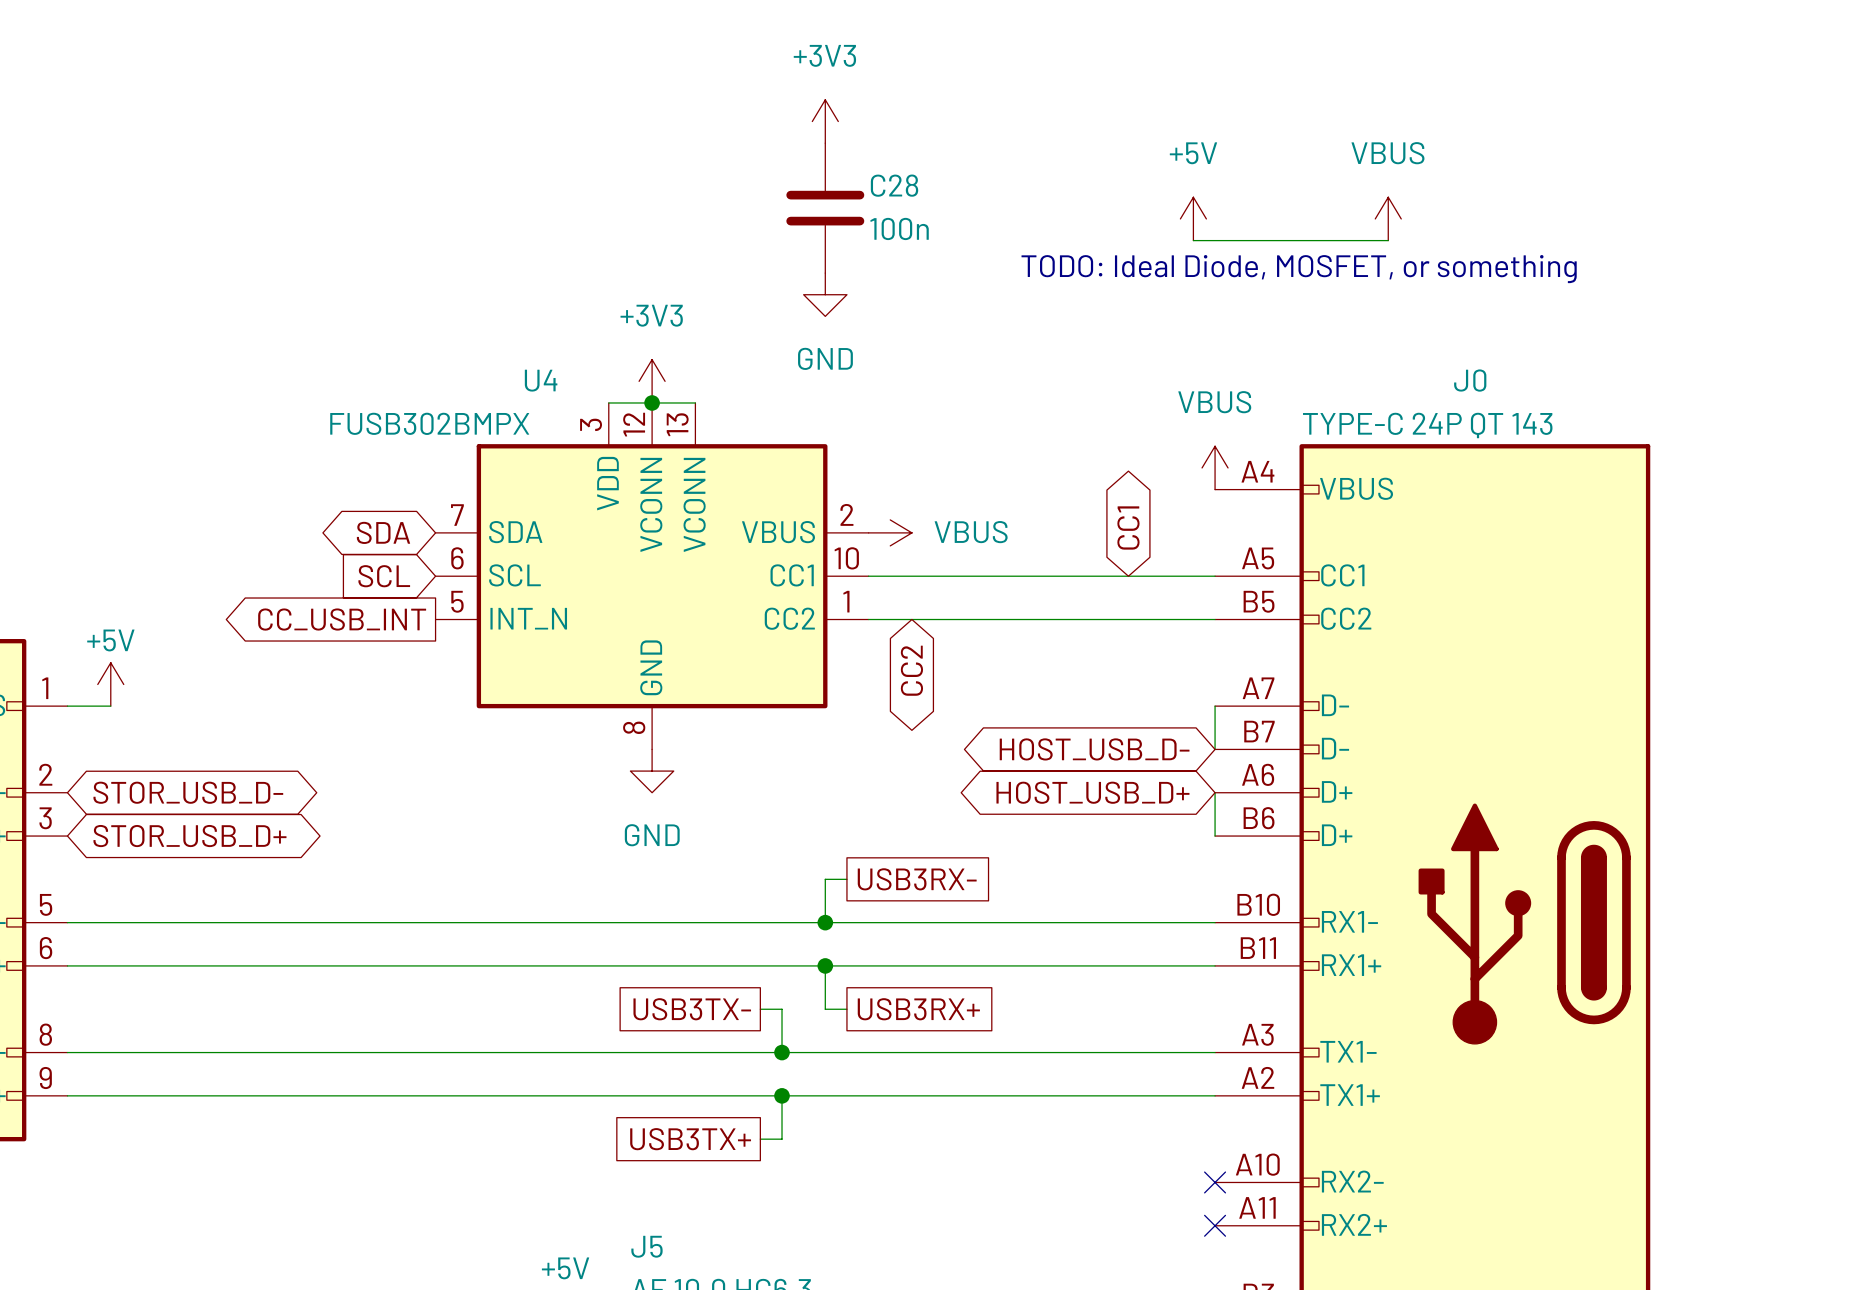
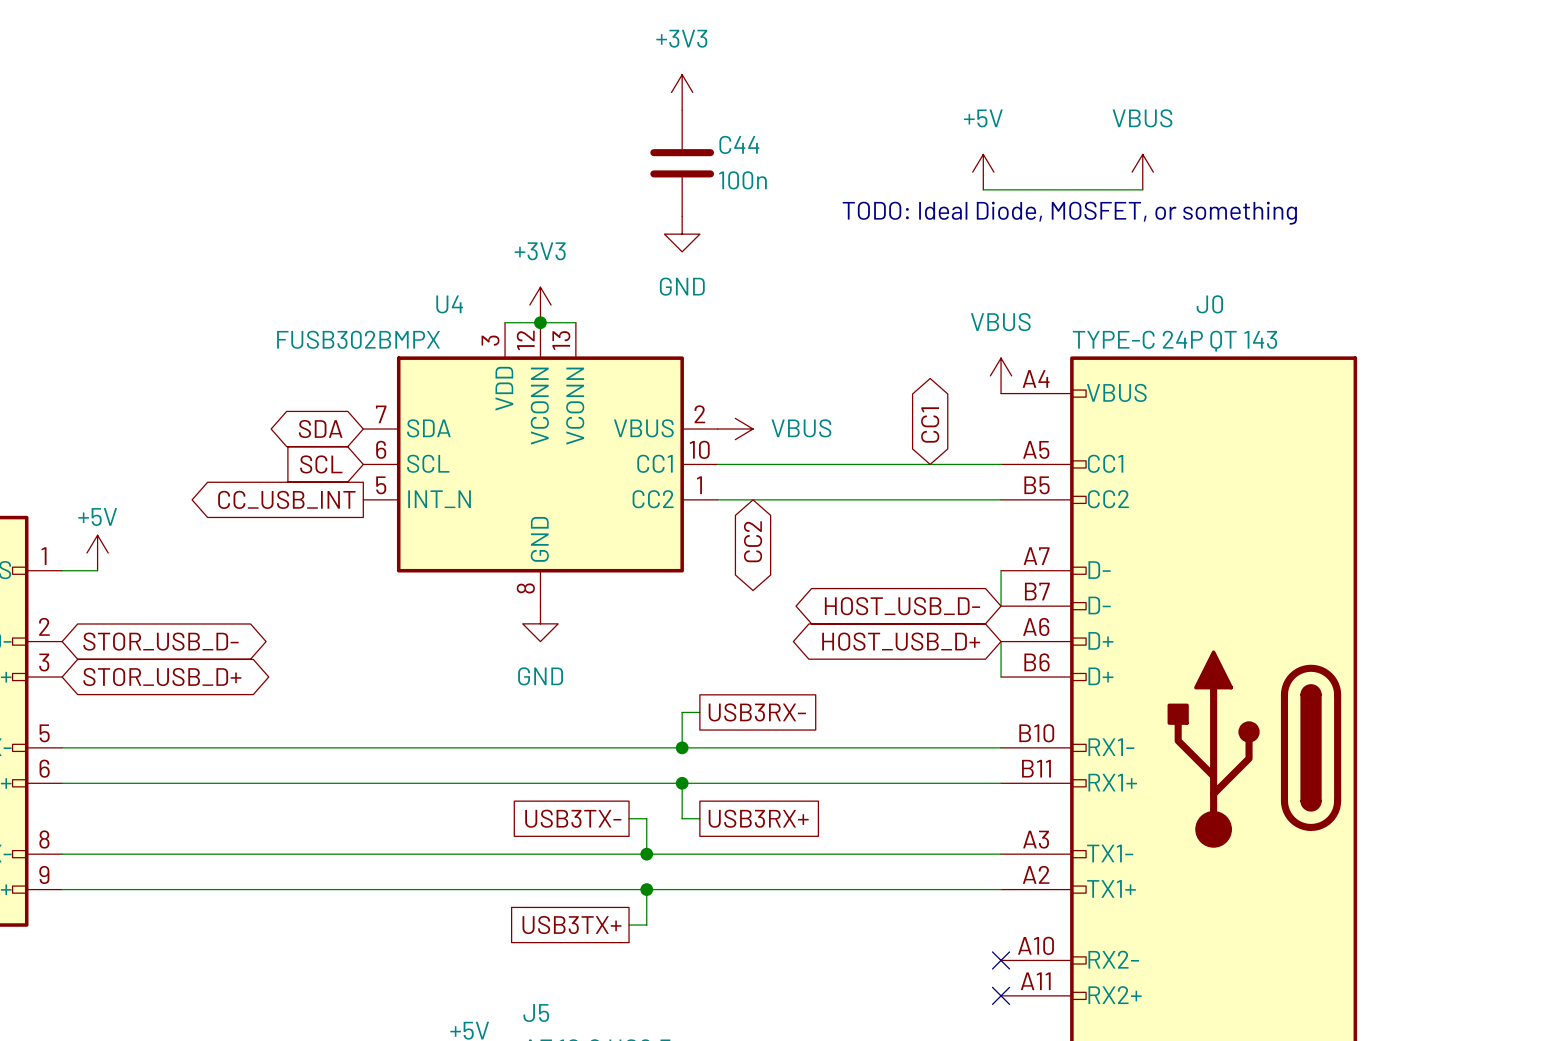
C28 name: C28 (894, 185) -> C44 (739, 144)

